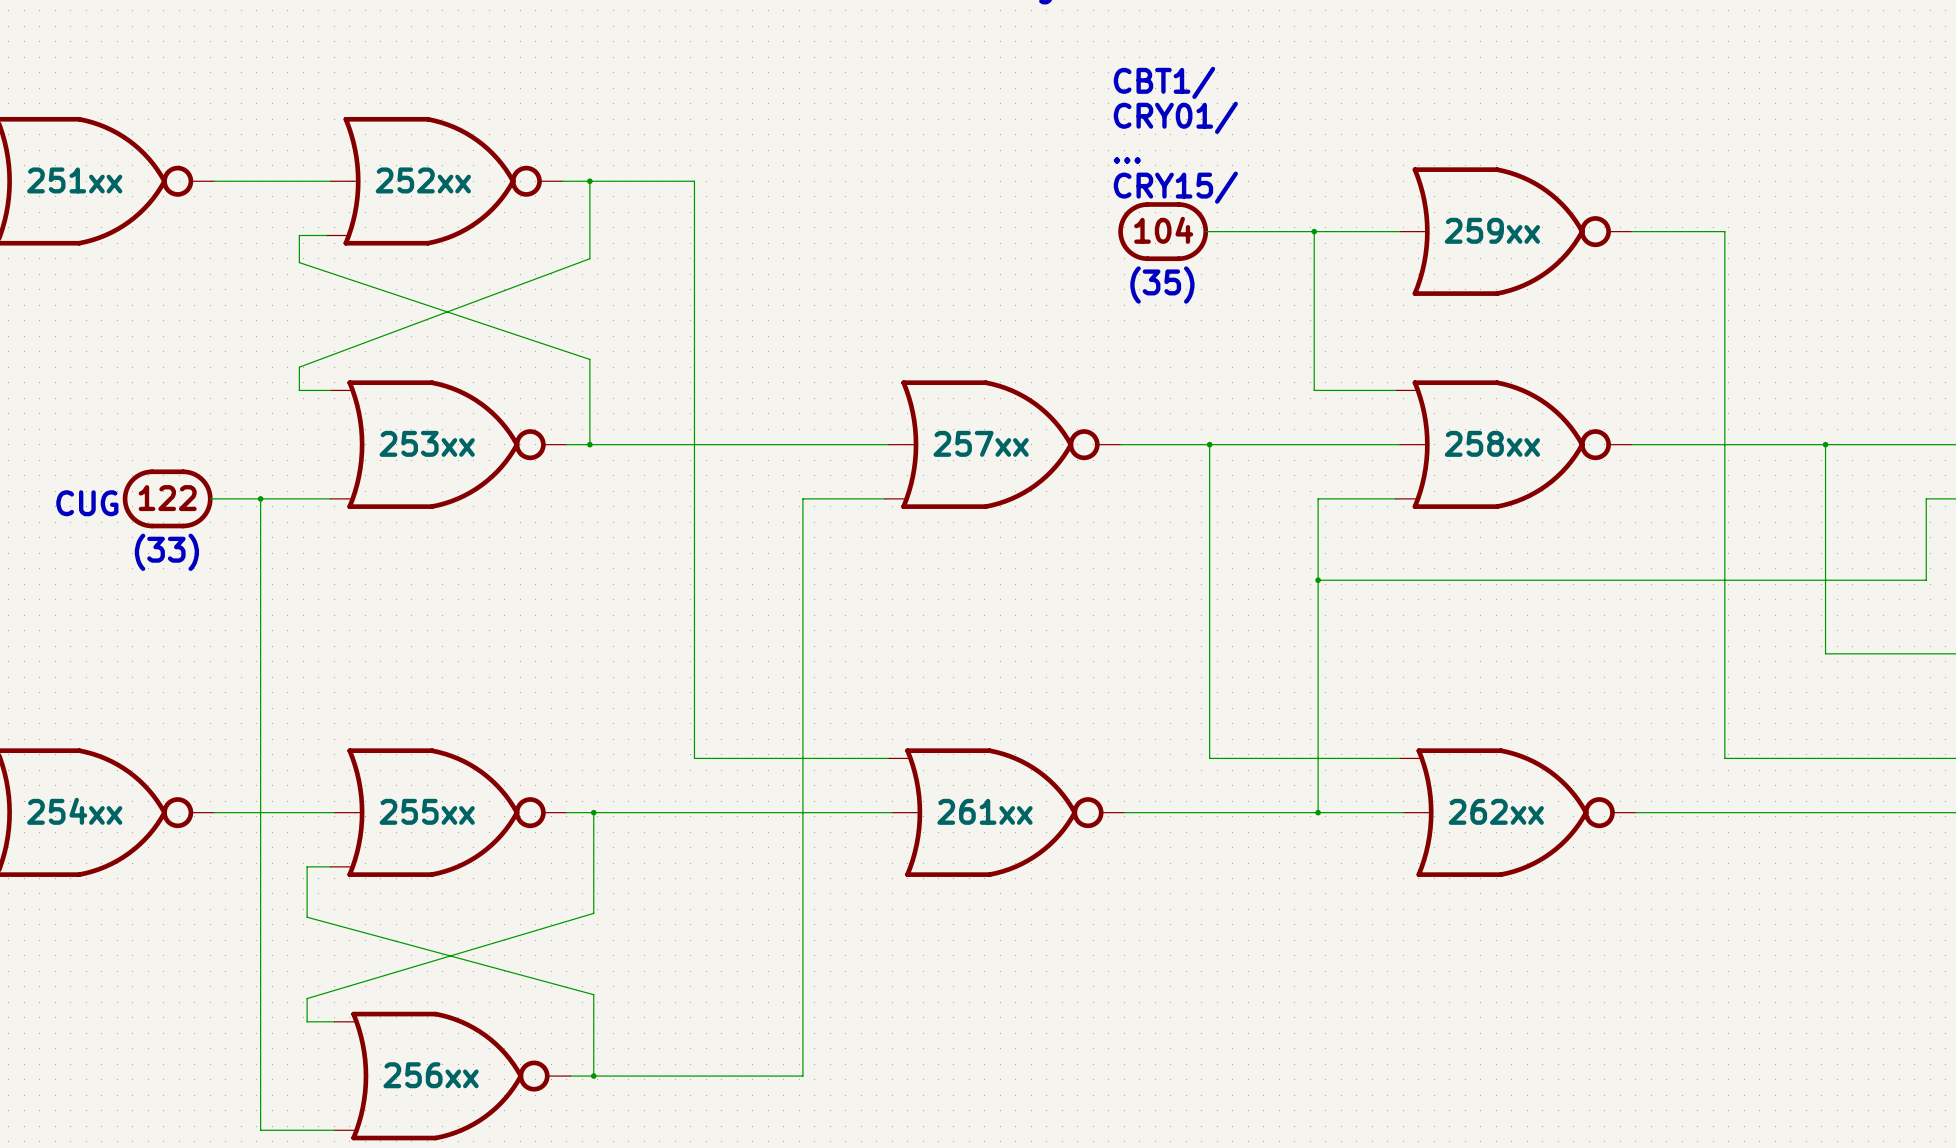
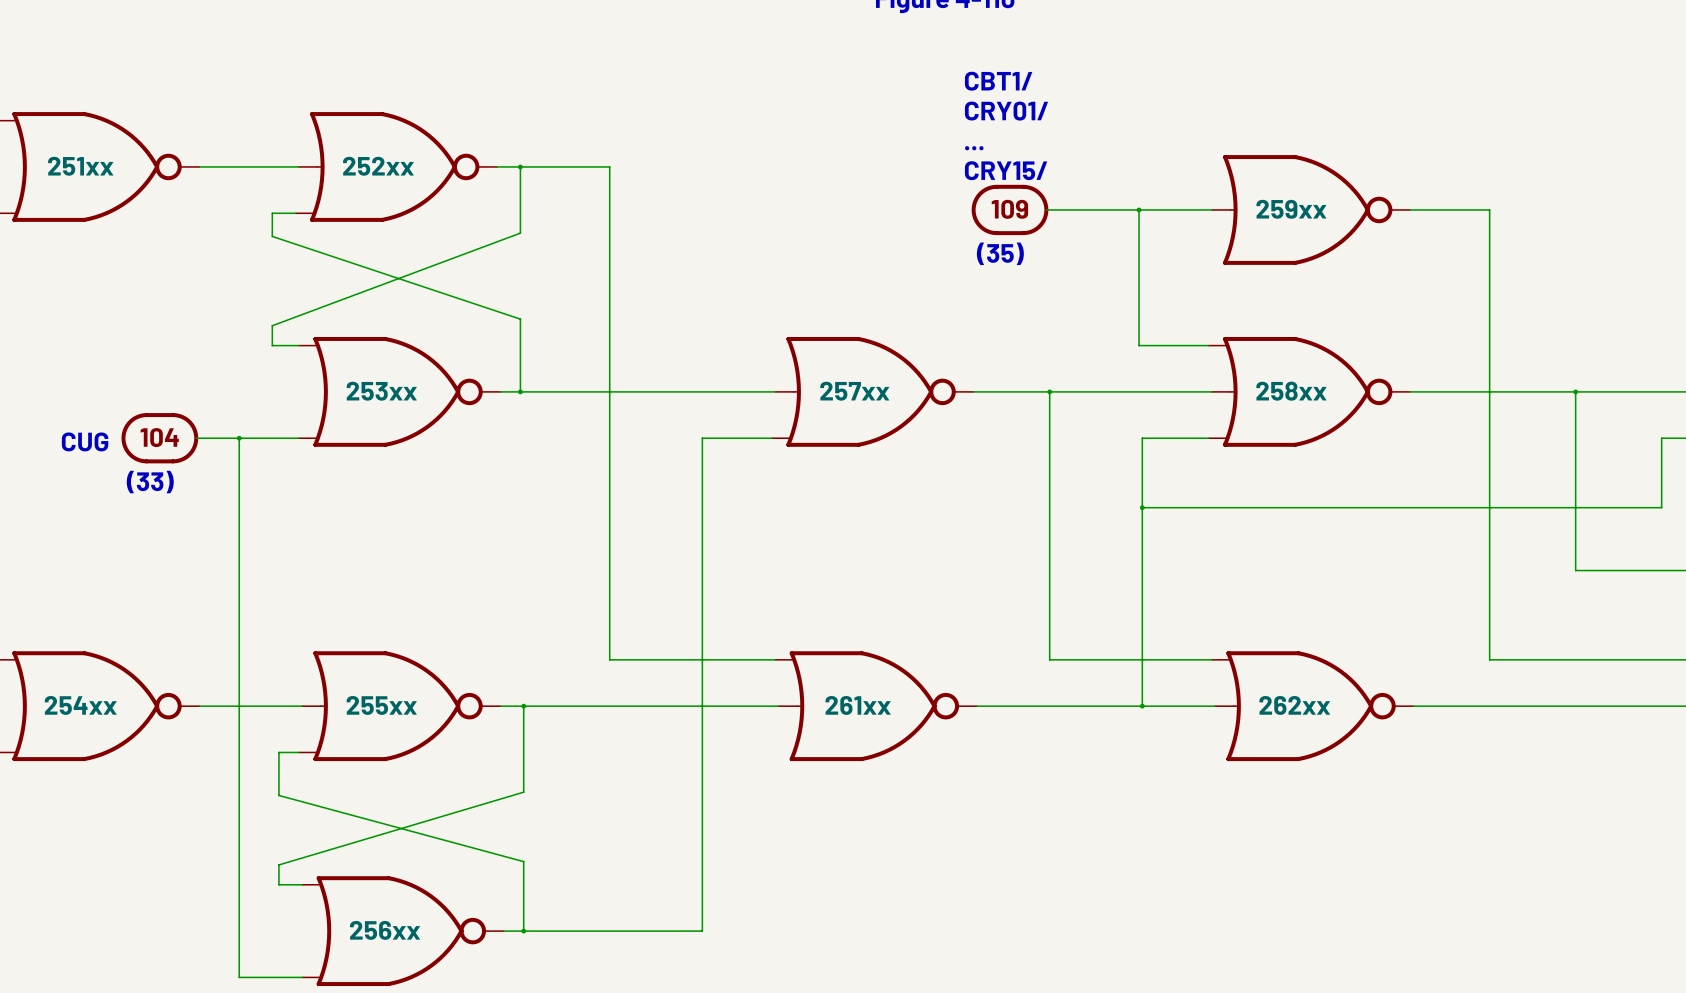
part text: 104 (1163, 230) -> 109 (1009, 209)
part text: 122 (167, 498) -> 104 (159, 437)

